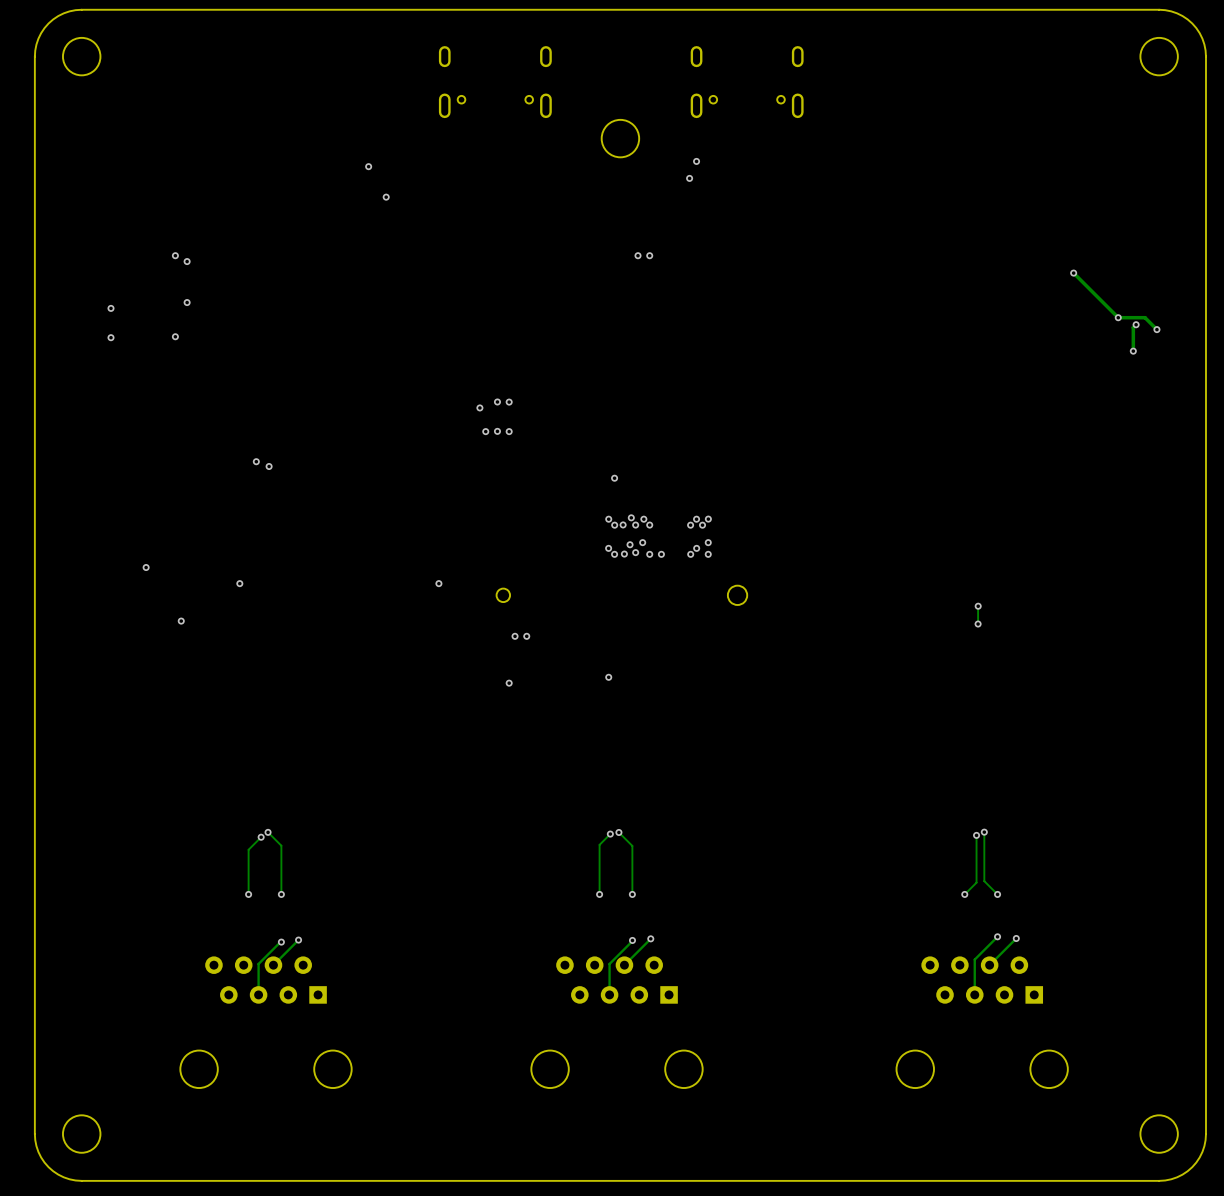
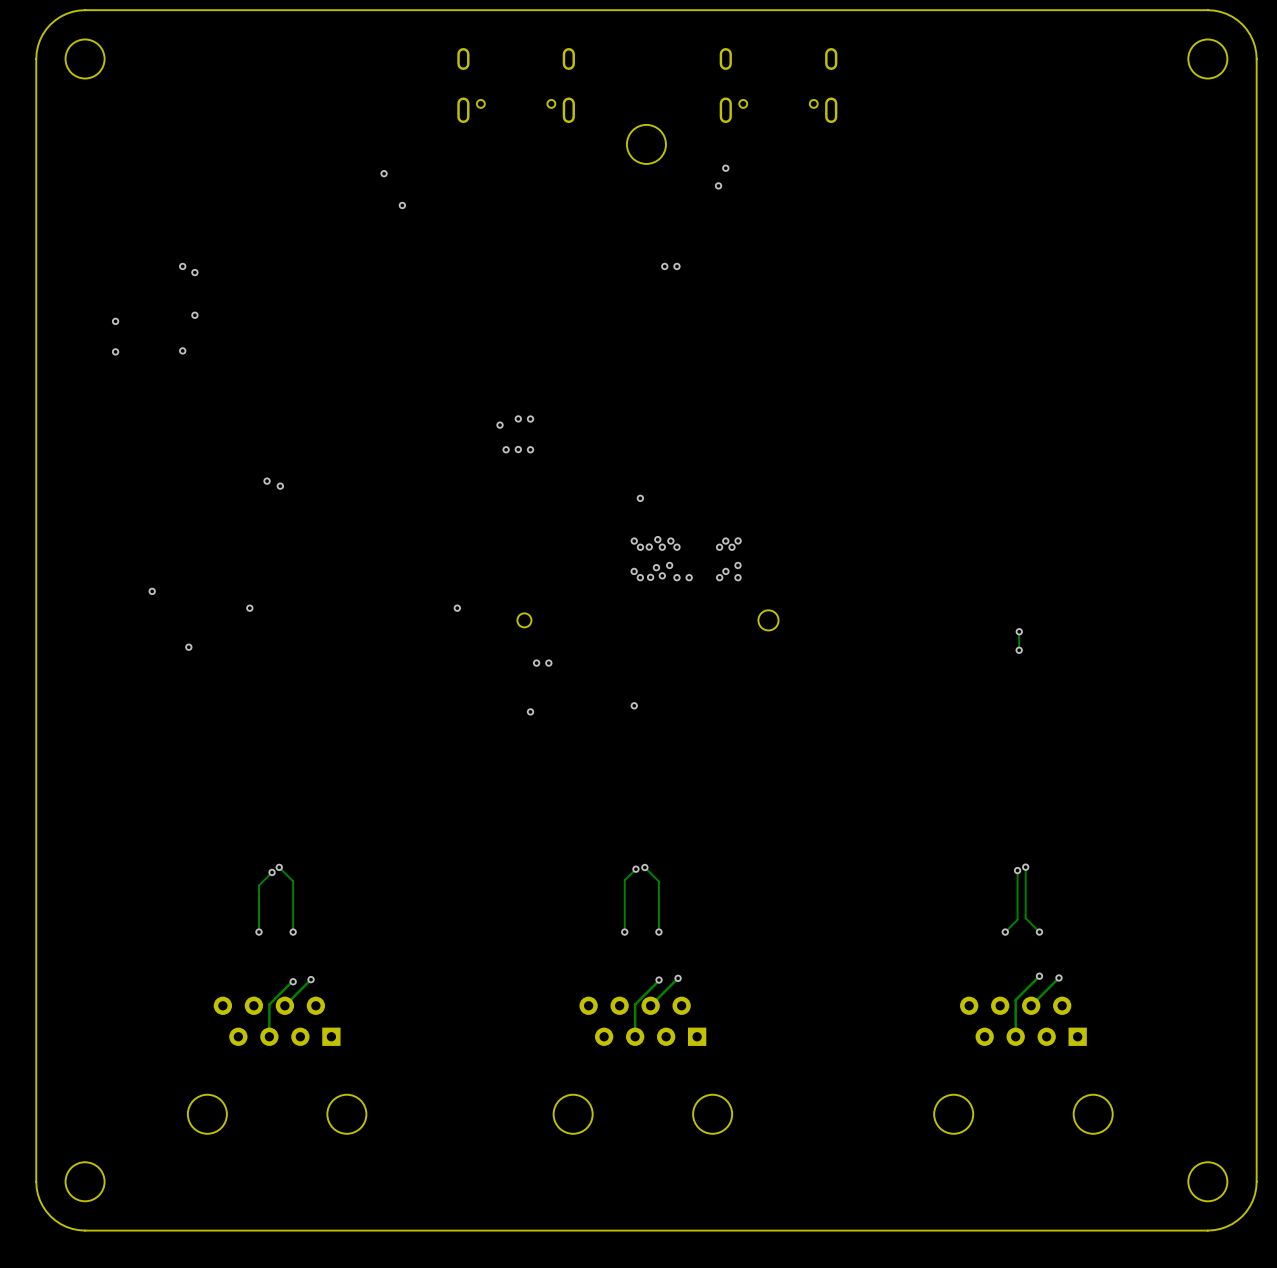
track: (1073, 273) (1118, 317) (1145, 317) (1156, 329) -> none
via: (1073, 273) -> none
via: (1118, 317) -> none
track: (1136, 324) (1133, 327) (1133, 350) -> none
via: (1136, 324) -> none
via: (1156, 329) -> none
via: (1133, 351) -> none

